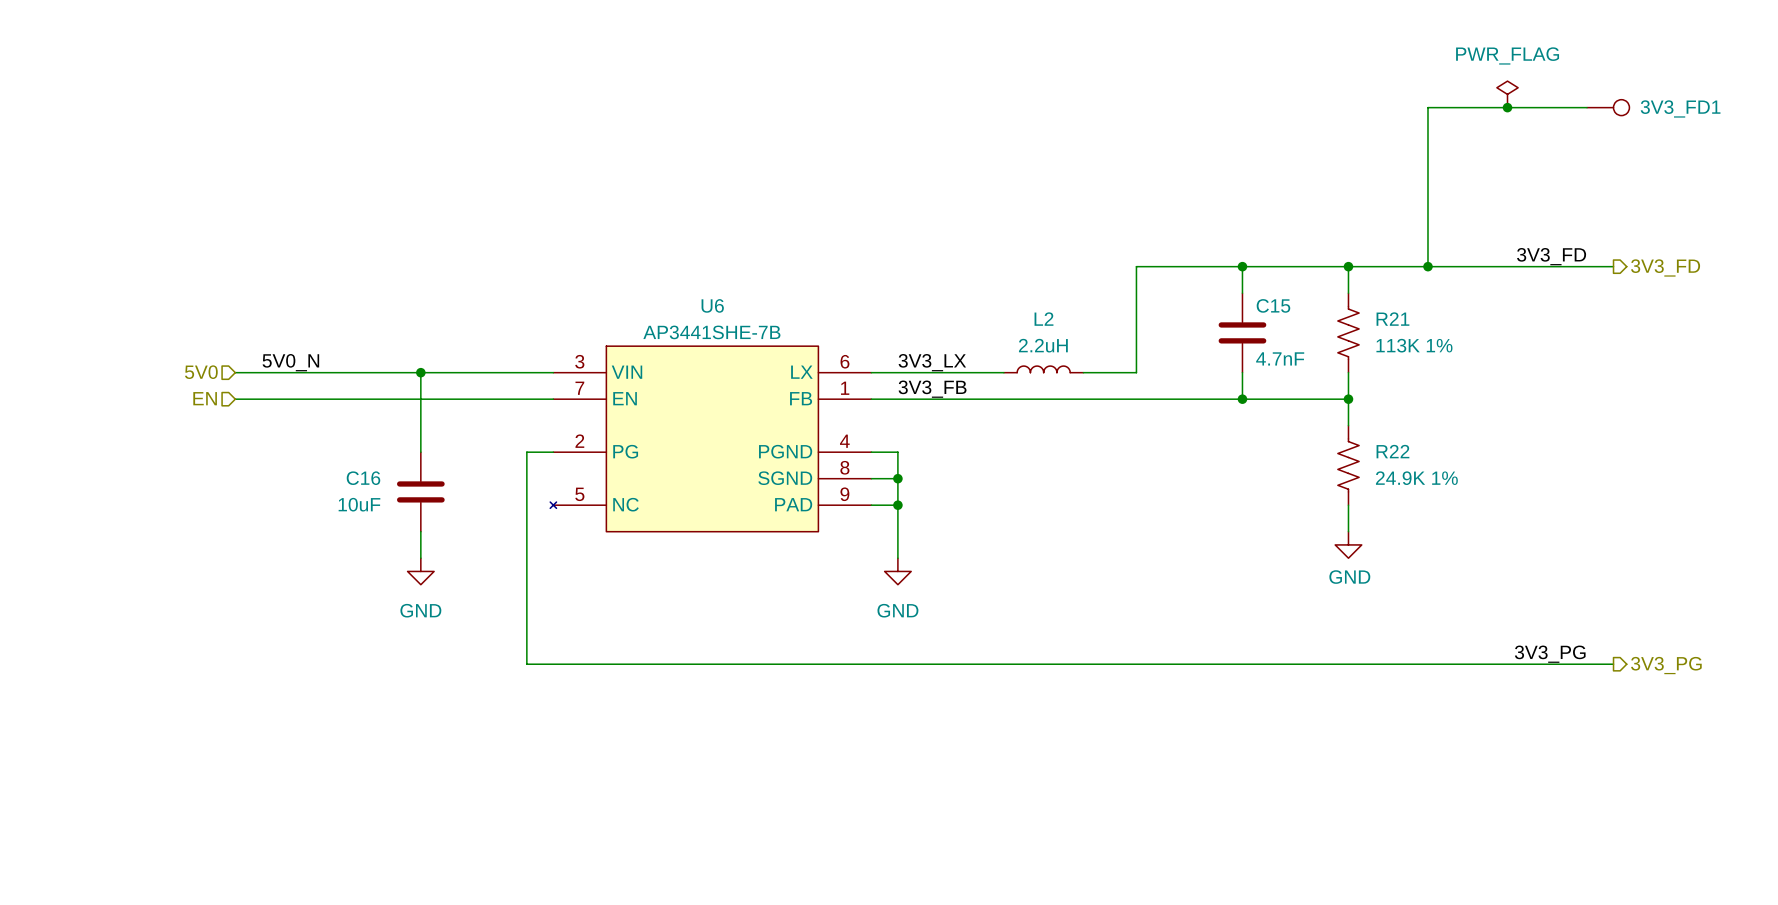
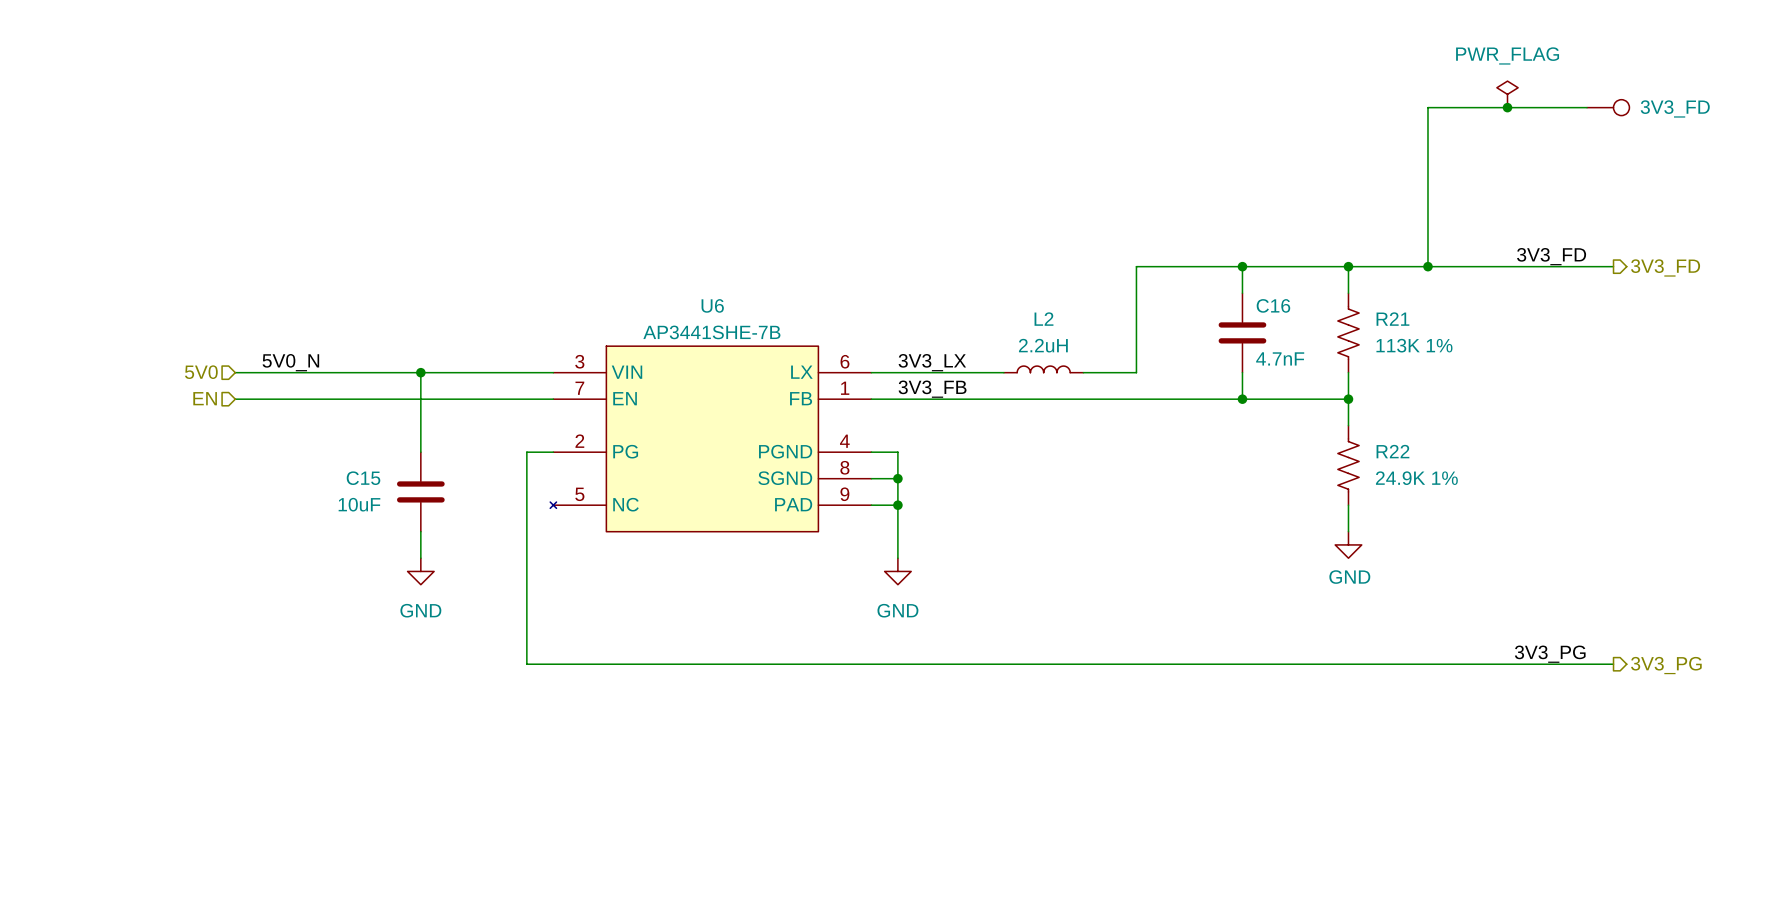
3V3_FD1 name: 3V3_FD1 (1680, 108) -> 3V3_FD (1675, 108)
C15 name: C15 (1273, 305) -> C16 (1273, 305)
C16 name: C16 (363, 478) -> C15 (363, 478)

